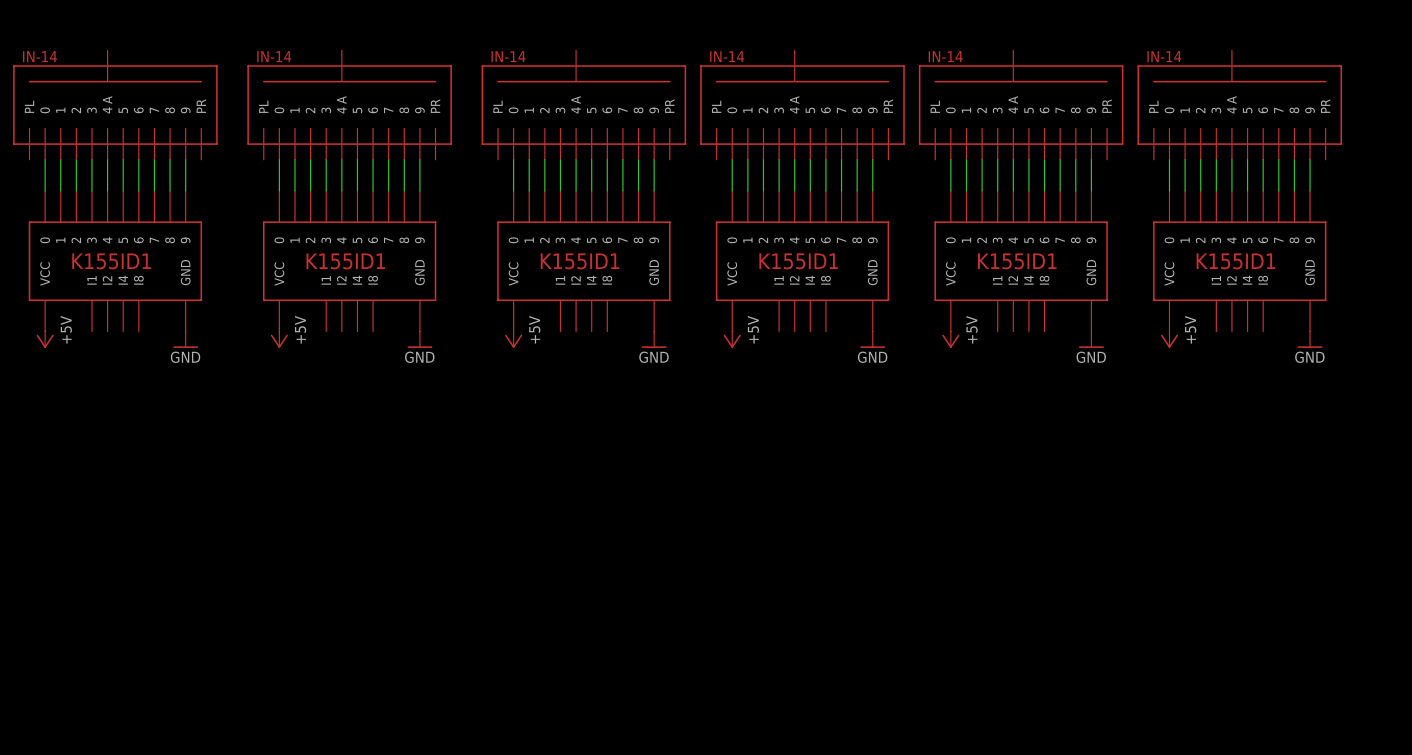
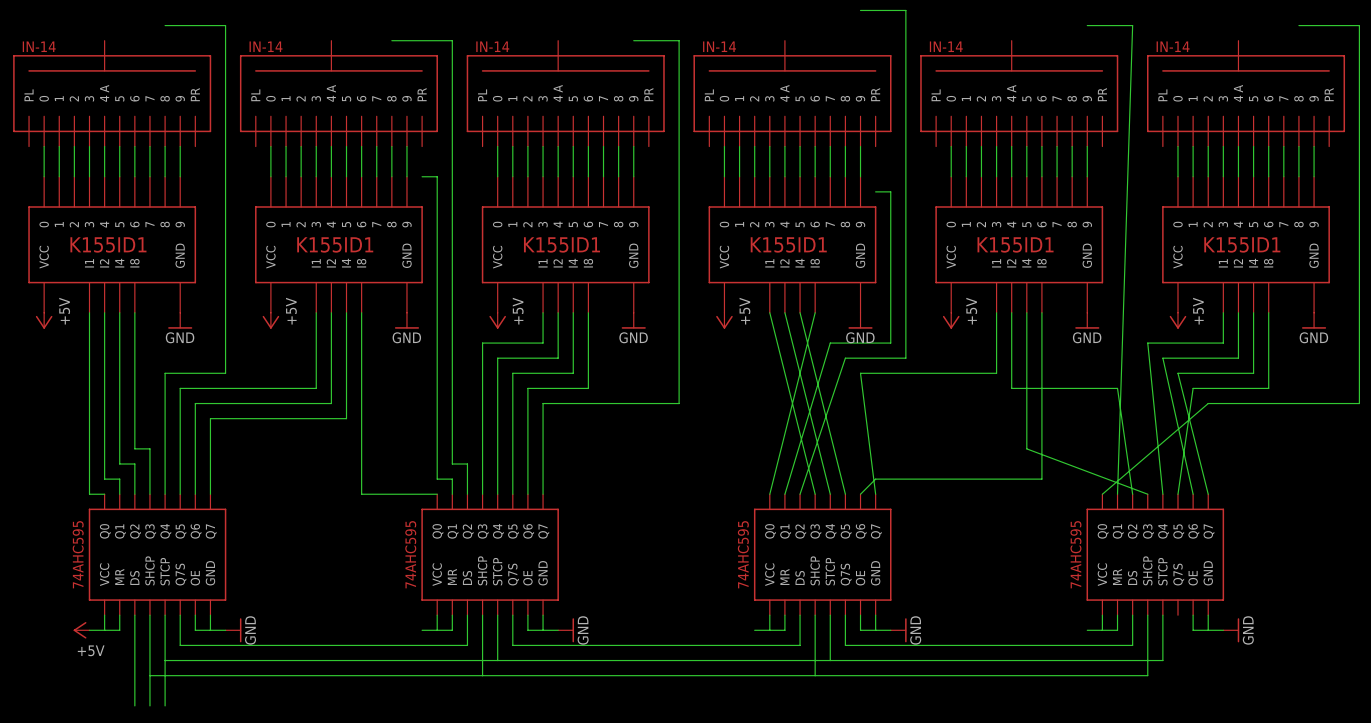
wire: none -> (860, 10) (905, 10) (905, 358) (845, 358) (800, 494)
wire: none -> (165, 25) (225, 25) (225, 373) (165, 373) (165, 494)
wire: none -> (1087, 25) (1132, 25) (1117, 494)
wire: none -> (1298, 25) (1359, 25) (1359, 403) (1208, 403) (1102, 494)
wire: none -> (391, 40) (452, 40) (452, 464) (467, 464) (467, 494)
wire: none -> (633, 40) (679, 40) (679, 403) (543, 403) (543, 494)
part position: (802, 105) -> (792, 93)
part position: (1021, 105) -> (1019, 93)
part position: (1239, 105) -> (1246, 93)
wire: (732, 159) (732, 190) -> none
wire: (950, 159) (950, 190) -> (860, 146) (860, 176)
wire: (966, 159) (966, 190) -> none
wire: (1169, 159) (1169, 190) -> (1072, 146) (1072, 176)
wire: (1185, 159) (1185, 190) -> (1087, 146) (1087, 176)
wire: (1200, 159) (1200, 190) -> (1298, 146) (1298, 176)
wire: none -> (1283, 146) (1283, 176)
wire: none -> (1314, 146) (1314, 176)
wire: none -> (422, 176) (437, 176) (437, 479) (452, 479) (452, 494)
wire: none -> (875, 191) (890, 191) (890, 343) (830, 343) (784, 494)
part position: (802, 261) -> (792, 244)
part position: (1021, 261) -> (1019, 244)
part position: (1239, 261) -> (1246, 244)
wire: none -> (89, 312) (89, 494) (104, 494)
wire: none -> (104, 312) (104, 479) (119, 479) (119, 494)
wire: none -> (119, 312) (119, 464) (134, 464) (134, 494)
wire: none -> (134, 312) (134, 448) (149, 448) (149, 494)
wire: none -> (316, 312) (316, 388) (180, 388) (180, 494)
wire: none -> (331, 312) (331, 403) (195, 403) (195, 494)
wire: none -> (346, 312) (346, 418) (210, 418) (210, 494)
wire: none -> (361, 312) (361, 494) (437, 494)
wire: none -> (543, 312) (543, 343) (482, 343) (482, 494)
wire: none -> (558, 312) (558, 358) (497, 358) (497, 494)
wire: none -> (573, 312) (573, 373) (512, 373) (512, 494)
wire: none -> (588, 312) (588, 388) (527, 388) (527, 494)
wire: none -> (769, 312) (815, 494)
wire: none -> (784, 312) (830, 494)
wire: none -> (800, 312) (845, 494)
wire: none -> (815, 312) (769, 494)
wire: none -> (996, 312) (996, 373) (860, 373) (875, 494)
wire: none -> (1011, 312) (1011, 388) (1117, 388) (1132, 494)
wire: none -> (1026, 312) (1026, 448) (1147, 494)
wire: none -> (1041, 312) (1041, 479) (875, 479) (860, 494)
wire: none -> (1223, 312) (1223, 343) (1147, 343) (1162, 494)
wire: none -> (1238, 312) (1238, 358) (1162, 358) (1193, 494)
wire: none -> (1253, 312) (1253, 373) (1177, 373) (1208, 494)
wire: none -> (1268, 312) (1268, 388) (1193, 388) (1177, 494)
power symbol position: +5V (732, 339) -> +5V (724, 320)
power symbol position: GND (872, 339) -> GND (860, 320)
power symbol position: +5V (950, 339) -> +5V (951, 320)
power symbol position: GND (1091, 339) -> GND (1087, 320)
power symbol position: +5V (1169, 339) -> +5V (1177, 320)
power symbol position: GND (1310, 339) -> GND (1314, 320)
part: none -> (157, 554)
part: none -> (490, 554)
part: none -> (822, 554)
part: none -> (1155, 554)
wire: none -> (104, 615) (104, 630)
wire: none -> (119, 615) (119, 630) (89, 630)
wire: none -> (134, 615) (134, 705)
wire: none -> (149, 615) (149, 705)
wire: none -> (165, 615) (165, 705)
wire: none -> (180, 615) (180, 645) (467, 645) (467, 615)
wire: none -> (195, 615) (195, 630) (225, 630)
wire: none -> (210, 615) (210, 630)
wire: none -> (437, 615) (437, 630)
wire: none -> (452, 615) (452, 630) (422, 630)
wire: none -> (482, 615) (482, 675)
wire: none -> (497, 615) (497, 660)
wire: none -> (512, 615) (512, 645) (800, 645) (800, 615)
wire: none -> (527, 615) (527, 630) (558, 630)
wire: none -> (543, 615) (543, 630)
wire: none -> (769, 615) (769, 630)
wire: none -> (784, 615) (784, 630) (754, 630)
wire: none -> (815, 615) (815, 675)
wire: none -> (830, 615) (830, 660)
wire: none -> (845, 615) (845, 645) (1132, 645) (1132, 615)
wire: none -> (860, 615) (860, 630) (890, 630)
wire: none -> (875, 615) (875, 630)
wire: none -> (1102, 615) (1102, 630)
wire: none -> (1117, 615) (1117, 630) (1087, 630)
wire: none -> (1147, 615) (1147, 675) (149, 675)
wire: none -> (1162, 615) (1162, 660) (165, 660)
wire: none -> (1193, 615) (1193, 630) (1223, 630)
wire: none -> (1208, 615) (1208, 630)
power symbol: none -> +5V (81, 630)
power symbol: none -> GND (233, 630)
power symbol: none -> GND (566, 630)
power symbol: none -> GND (898, 630)
power symbol: none -> GND (1231, 630)

